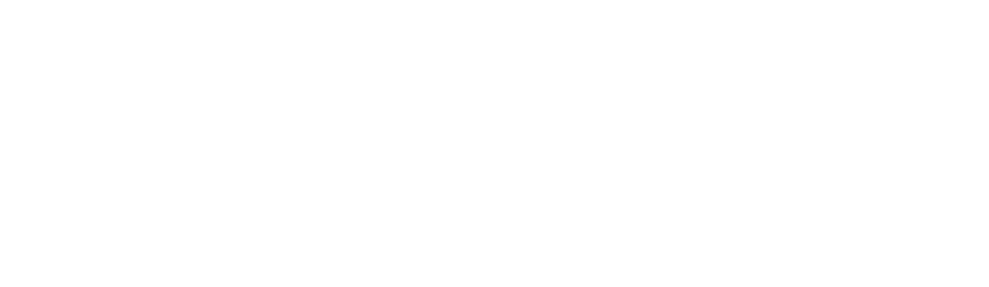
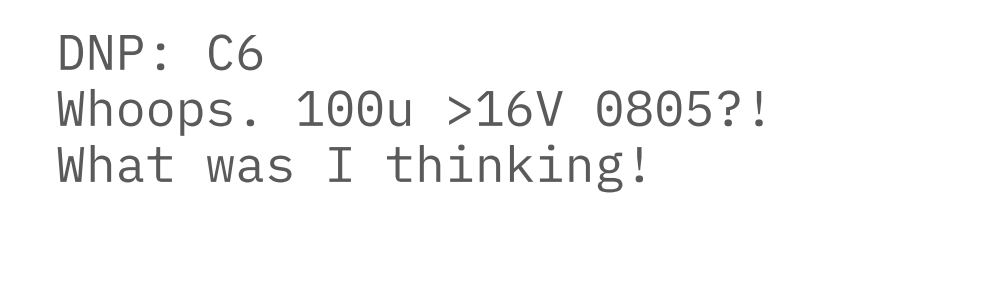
text: none -> DNP: C6 (161, 52)
text: none -> Whoops. 100u >16V 0805?! (410, 112)
text: none -> What was I thinking! (350, 168)

